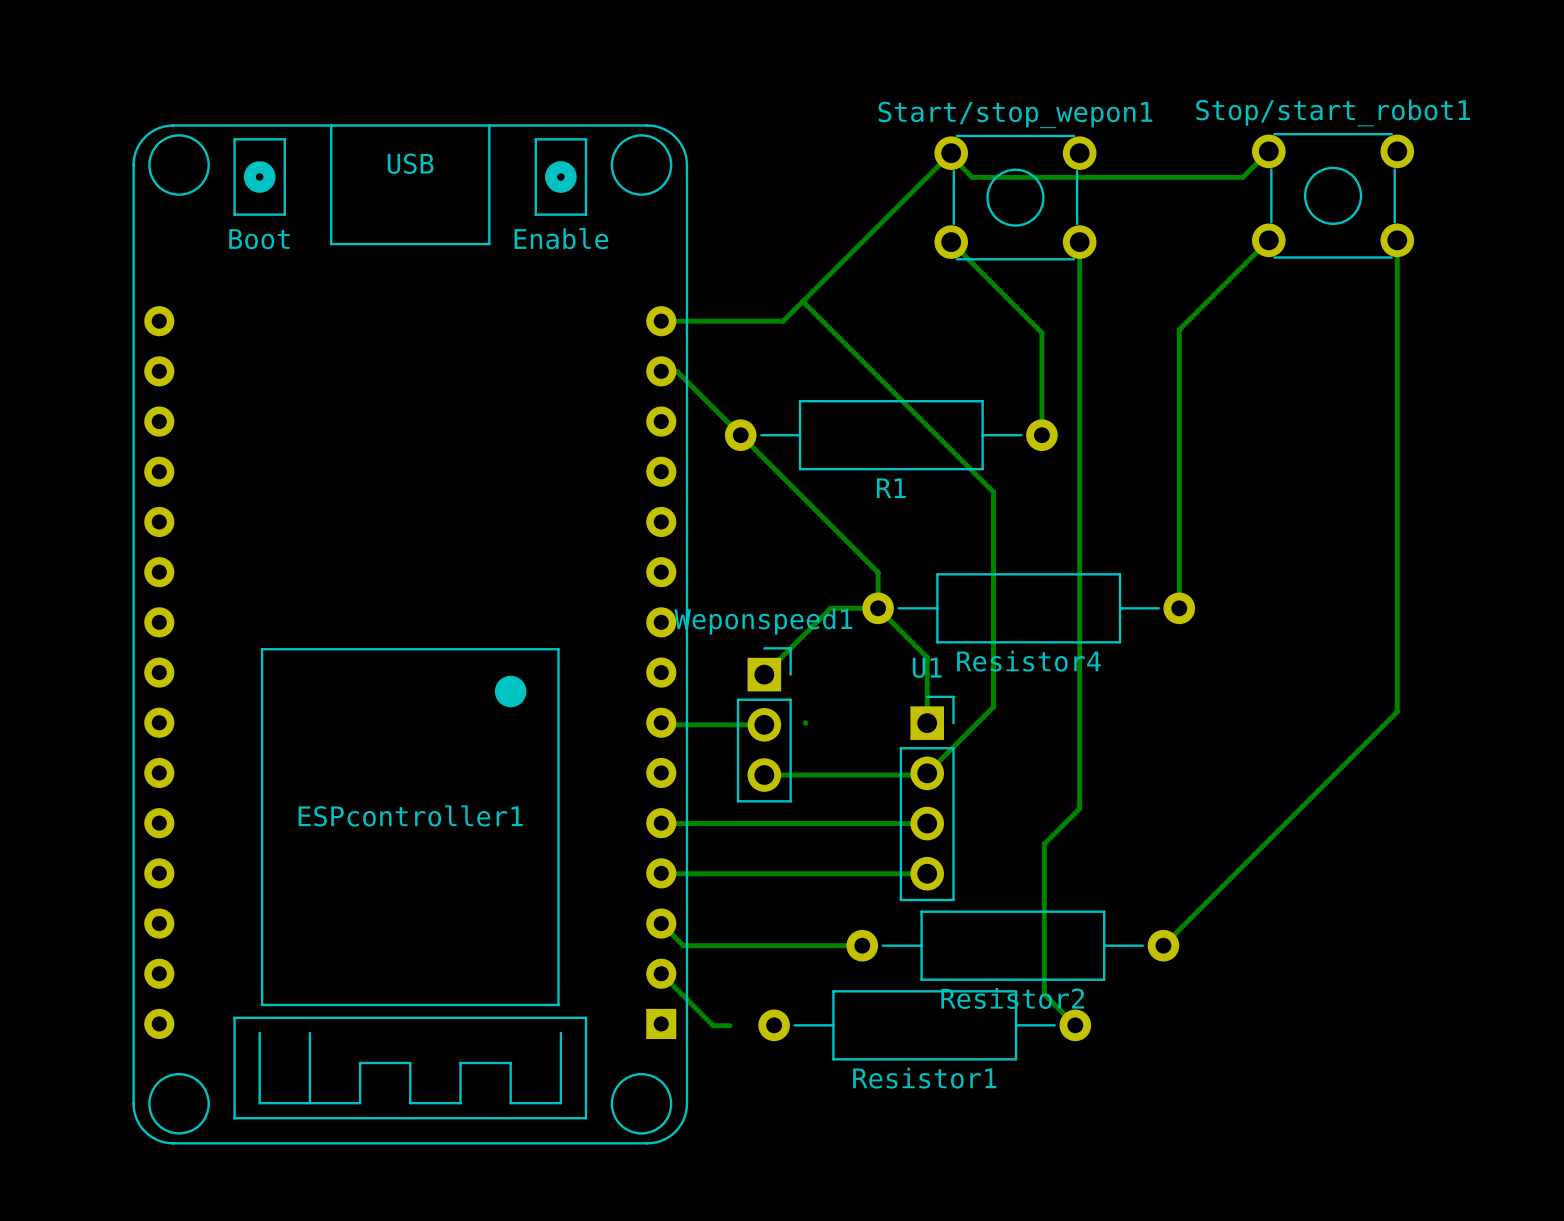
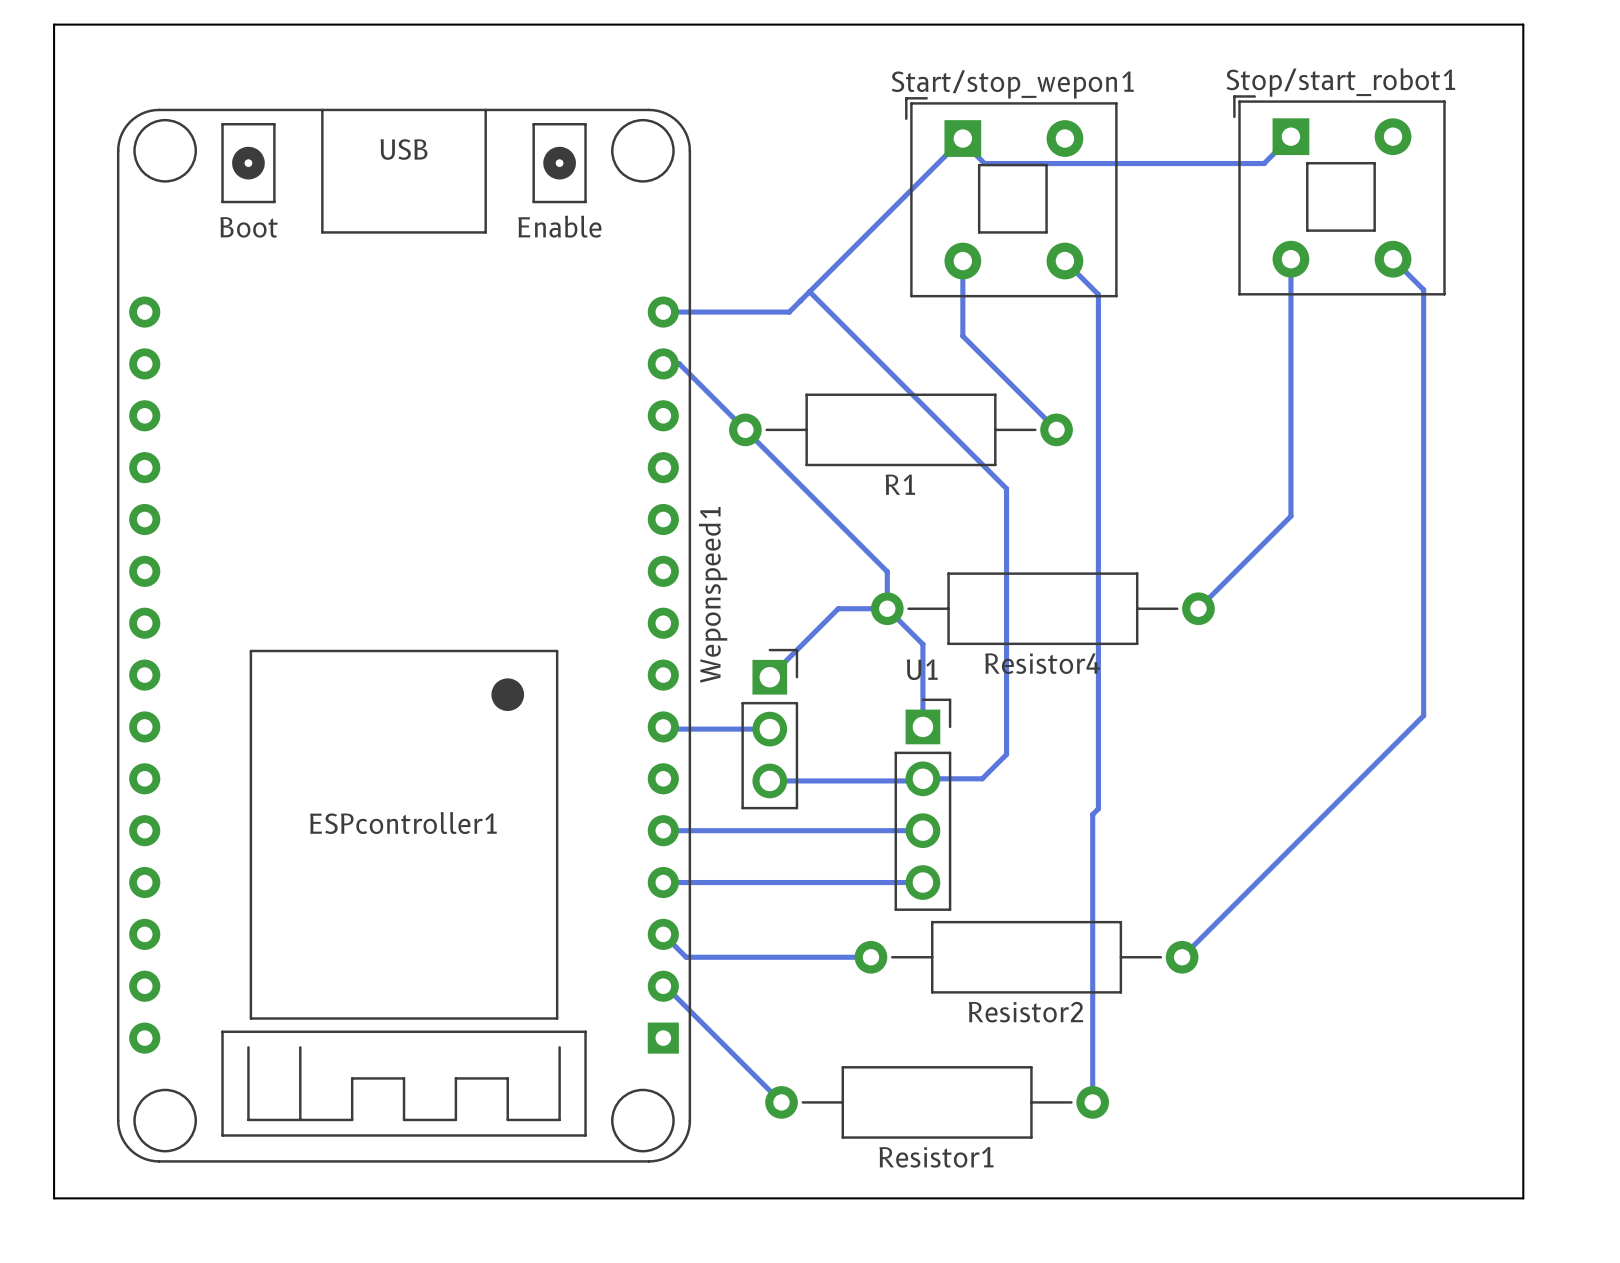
board edge: none -> (54, 24) (1523, 24) (1523, 1198) (54, 1198) (54, 24)
Stop/start_robot1 footprint: [1252, 133, 1415, 259] -> [1233, 95, 1446, 296]
Start/stop_wepon1 footprint: [934, 134, 1097, 261] -> [905, 97, 1118, 298]
bottom track: (1268, 240) (1179, 329) (1179, 608) -> (1290, 259) (1290, 516) (1198, 608)
bottom track: (1397, 240) (1397, 299) -> (1393, 259) (1423, 289)
bottom track: (951, 242) (1041, 332) (1041, 435) -> (962, 261) (962, 336) (1056, 429)
bottom track: (1079, 242) (1079, 808) (1044, 844) (1044, 994) (1075, 1025) -> none
bottom track: none -> (1064, 261) (1098, 294) (1098, 808) (1092, 814) (1092, 1102)
Weponspeed1 name rotation: 0° (763, 621) -> 90° counterclockwise (713, 594)
bottom track: (912, 642) (927, 657) (927, 723) -> (922, 644) (922, 726)
bottom track: (993, 707) (925, 775) (910, 775) -> (1006, 710) (1006, 754) (982, 778) (922, 778)
bottom track: (805, 722) (805, 723) -> none
U1 position: (927, 798) -> (922, 804)
bottom track: (661, 823) (927, 823) -> (663, 830) (922, 830)
bottom track: (661, 873) (927, 873) -> (663, 882) (922, 882)
bottom track: (661, 973) (713, 1025) (730, 1025) -> (663, 986) (781, 1102)
Resistor1 position: (924, 1025) -> (937, 1102)

